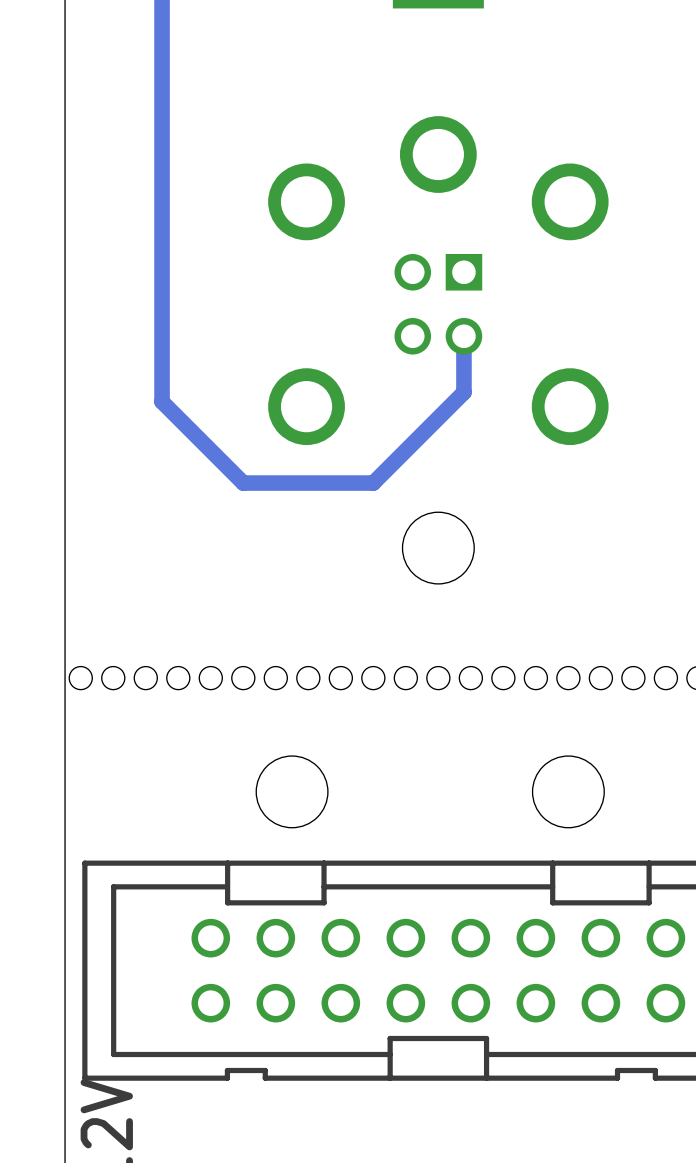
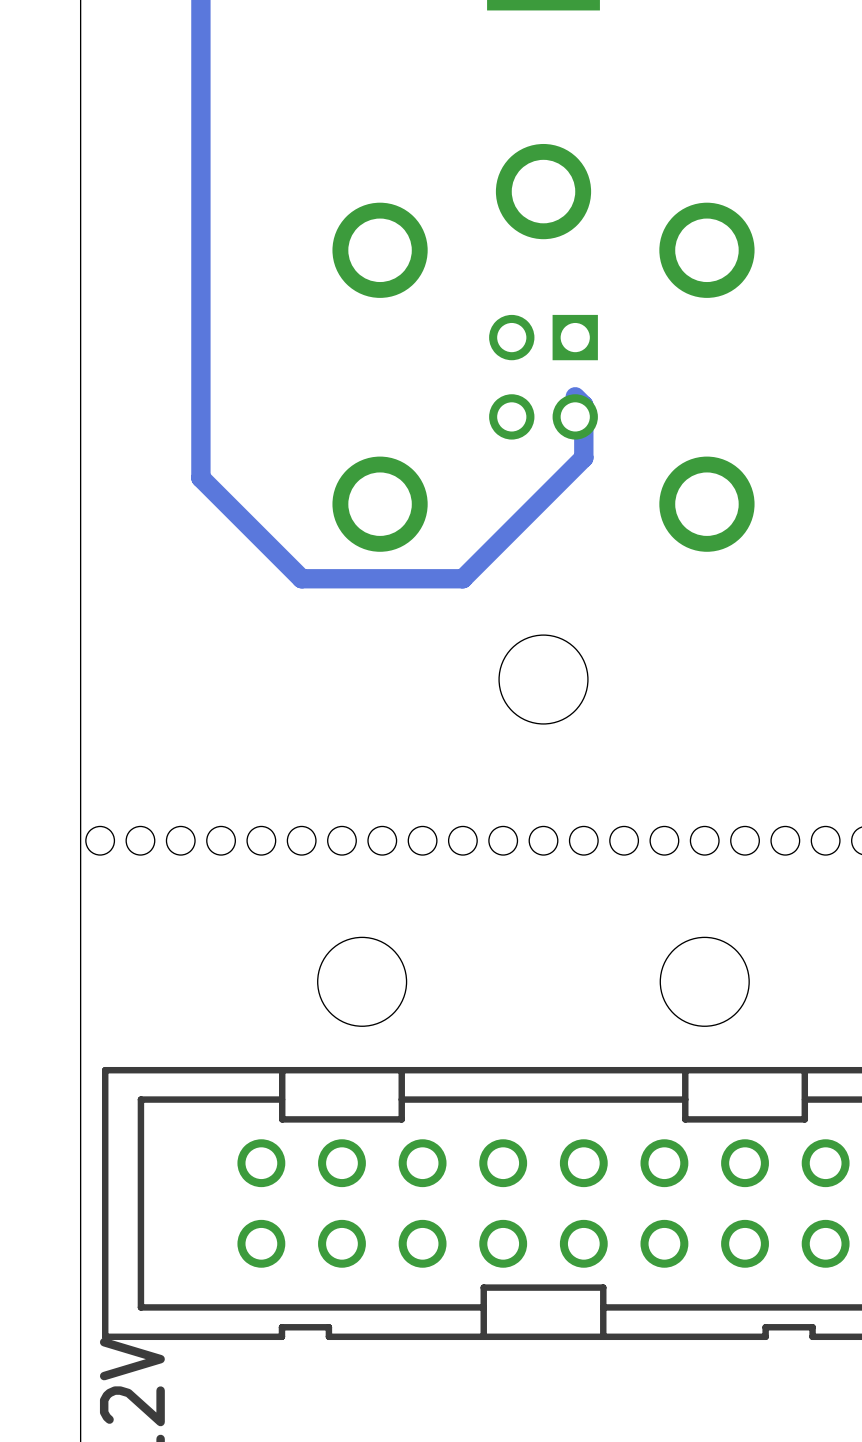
track: (463, 336) (463, 392) (373, 483) (243, 483) (162, 401) (162, 385) -> (575, 396) (583, 405) (583, 457) (462, 578) (301, 578) (200, 478)

